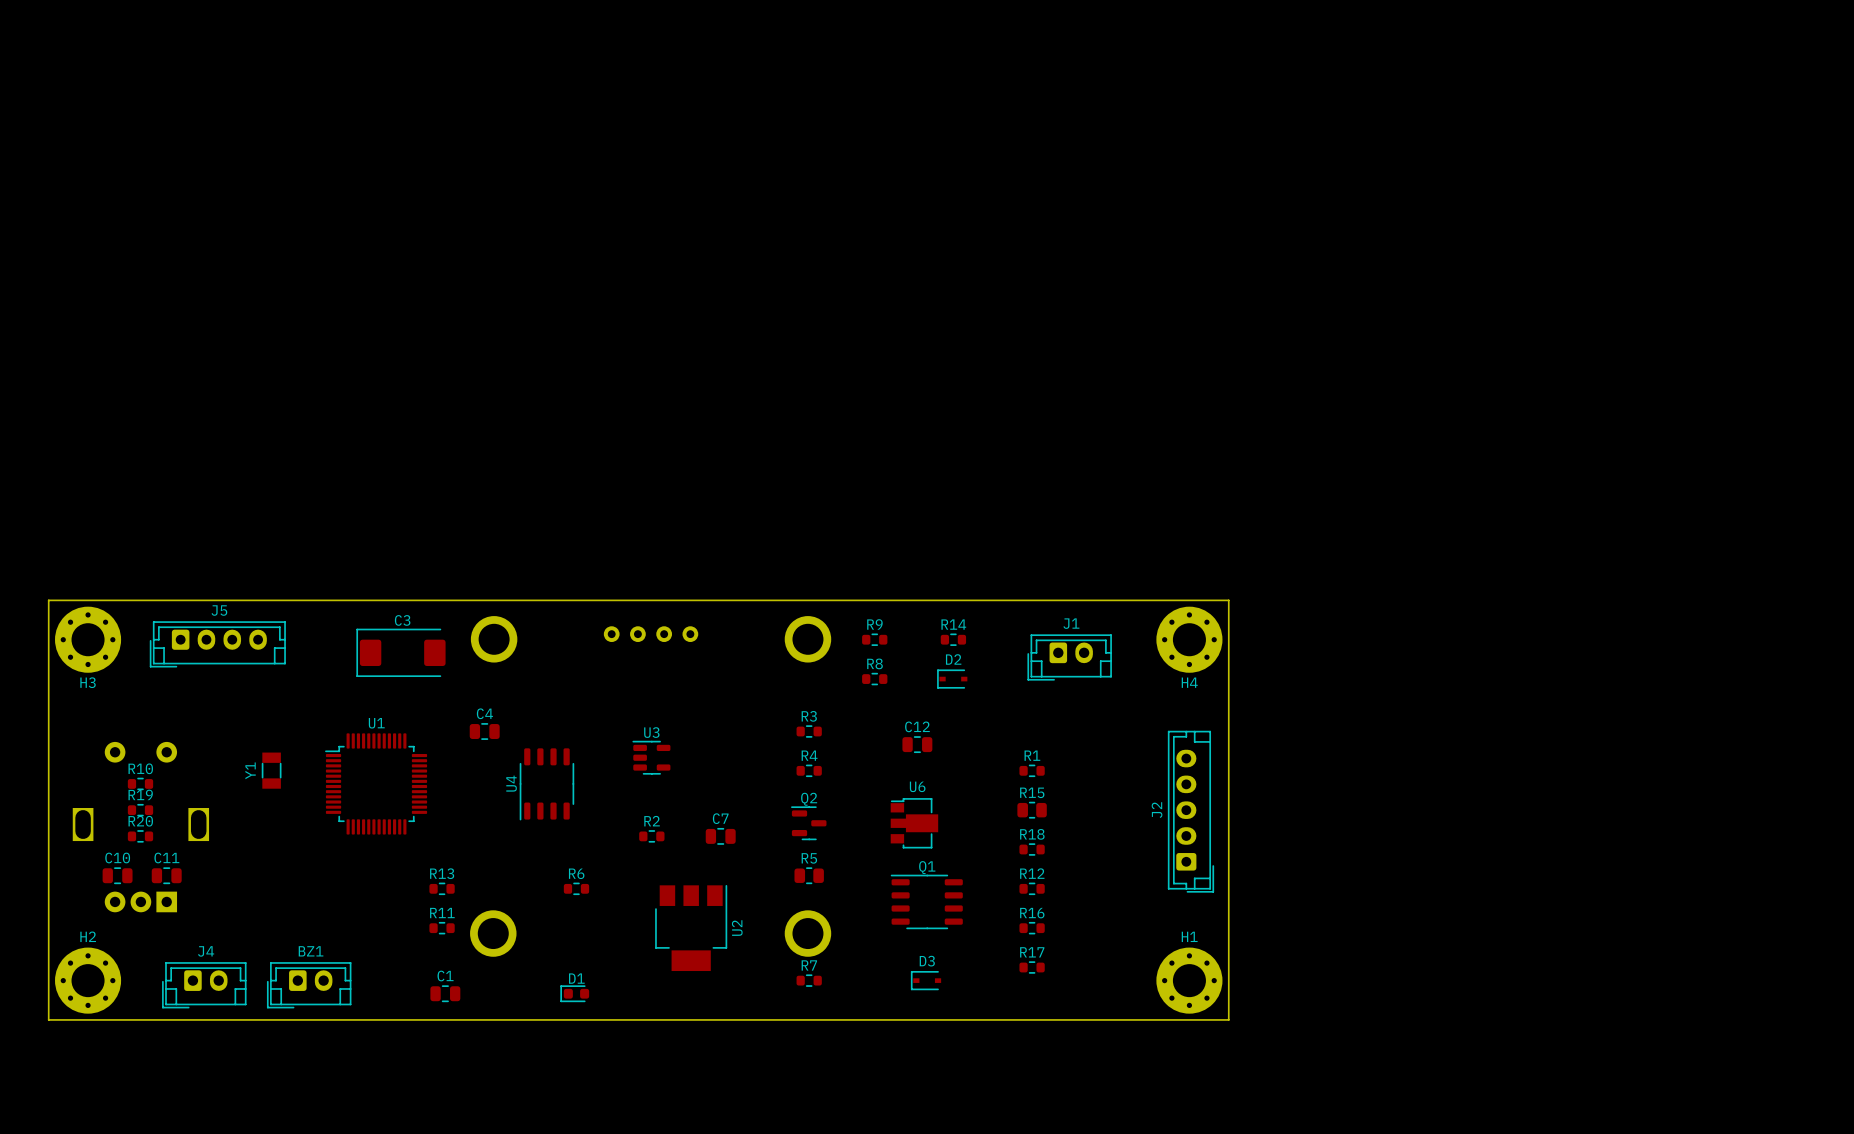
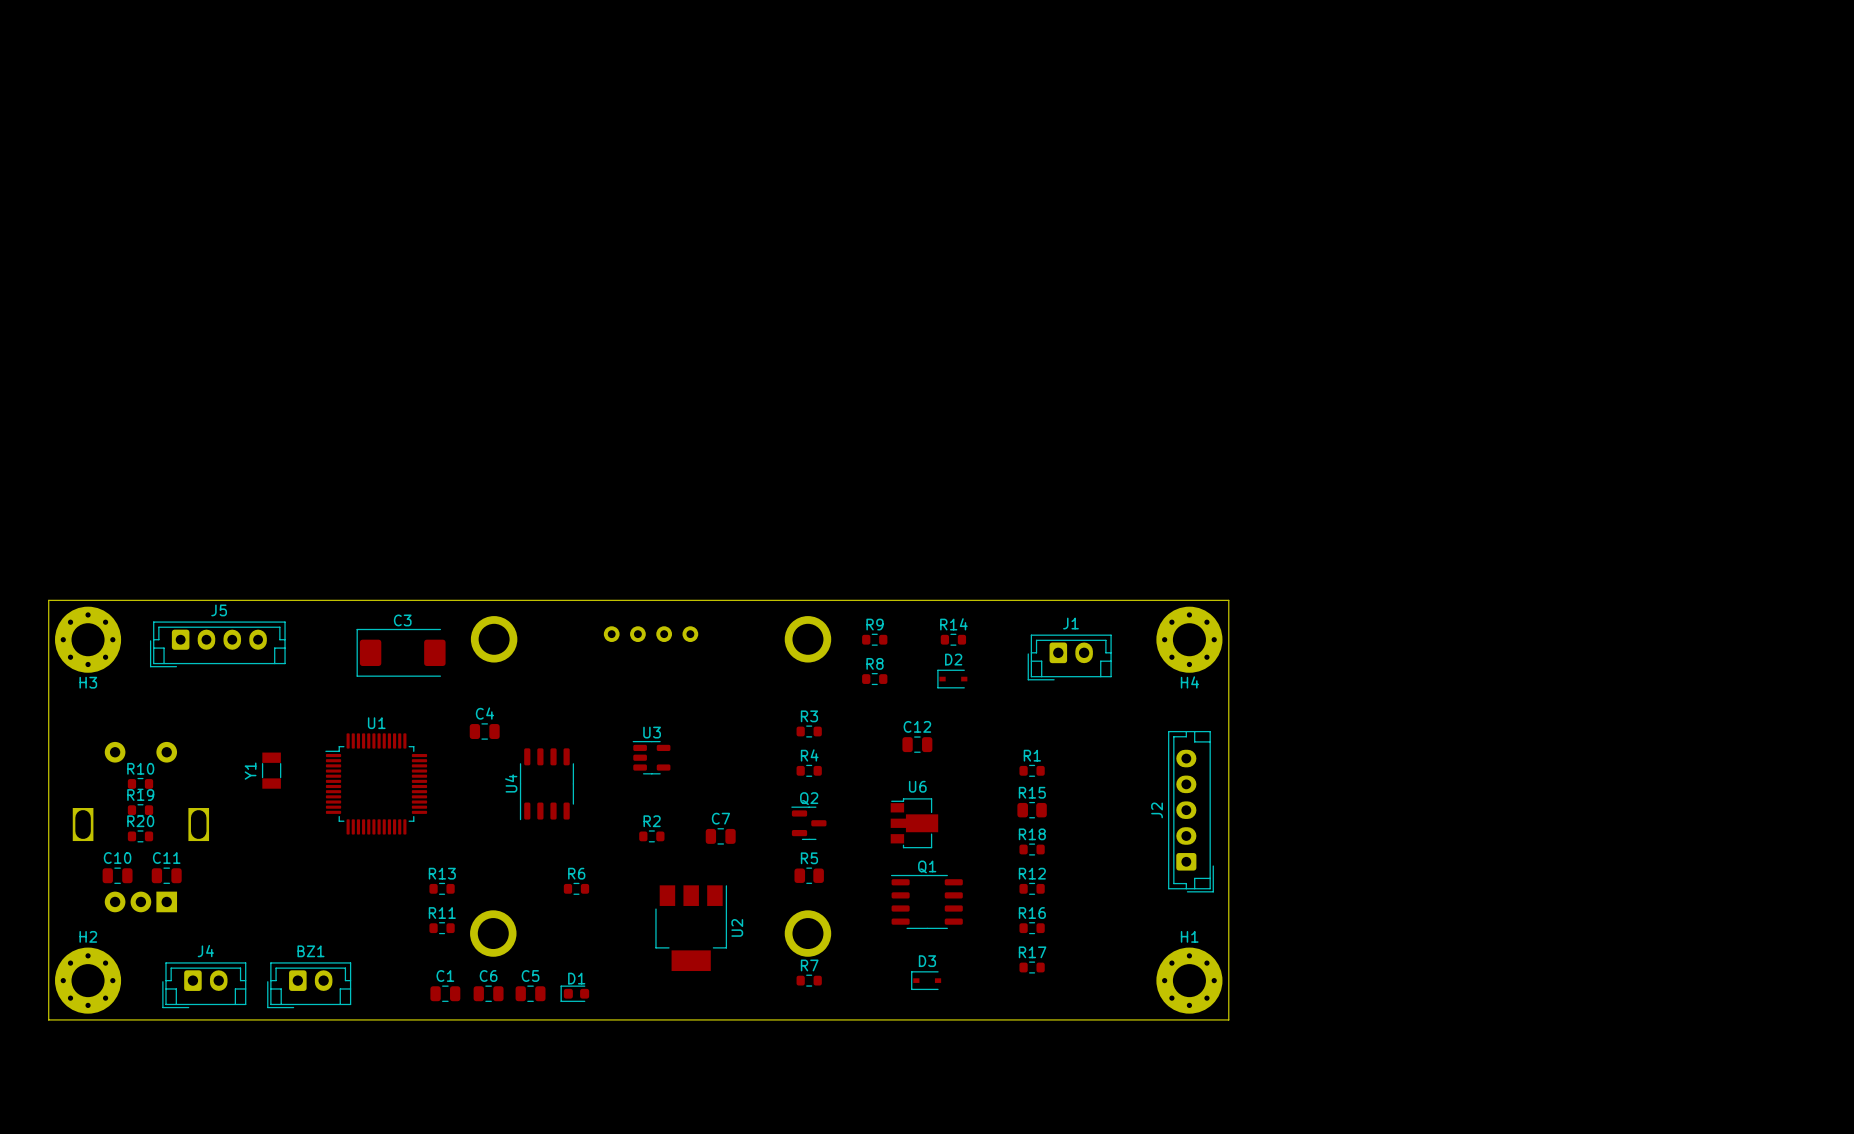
C6: none -> (488, 993)
C5: none -> (530, 993)

